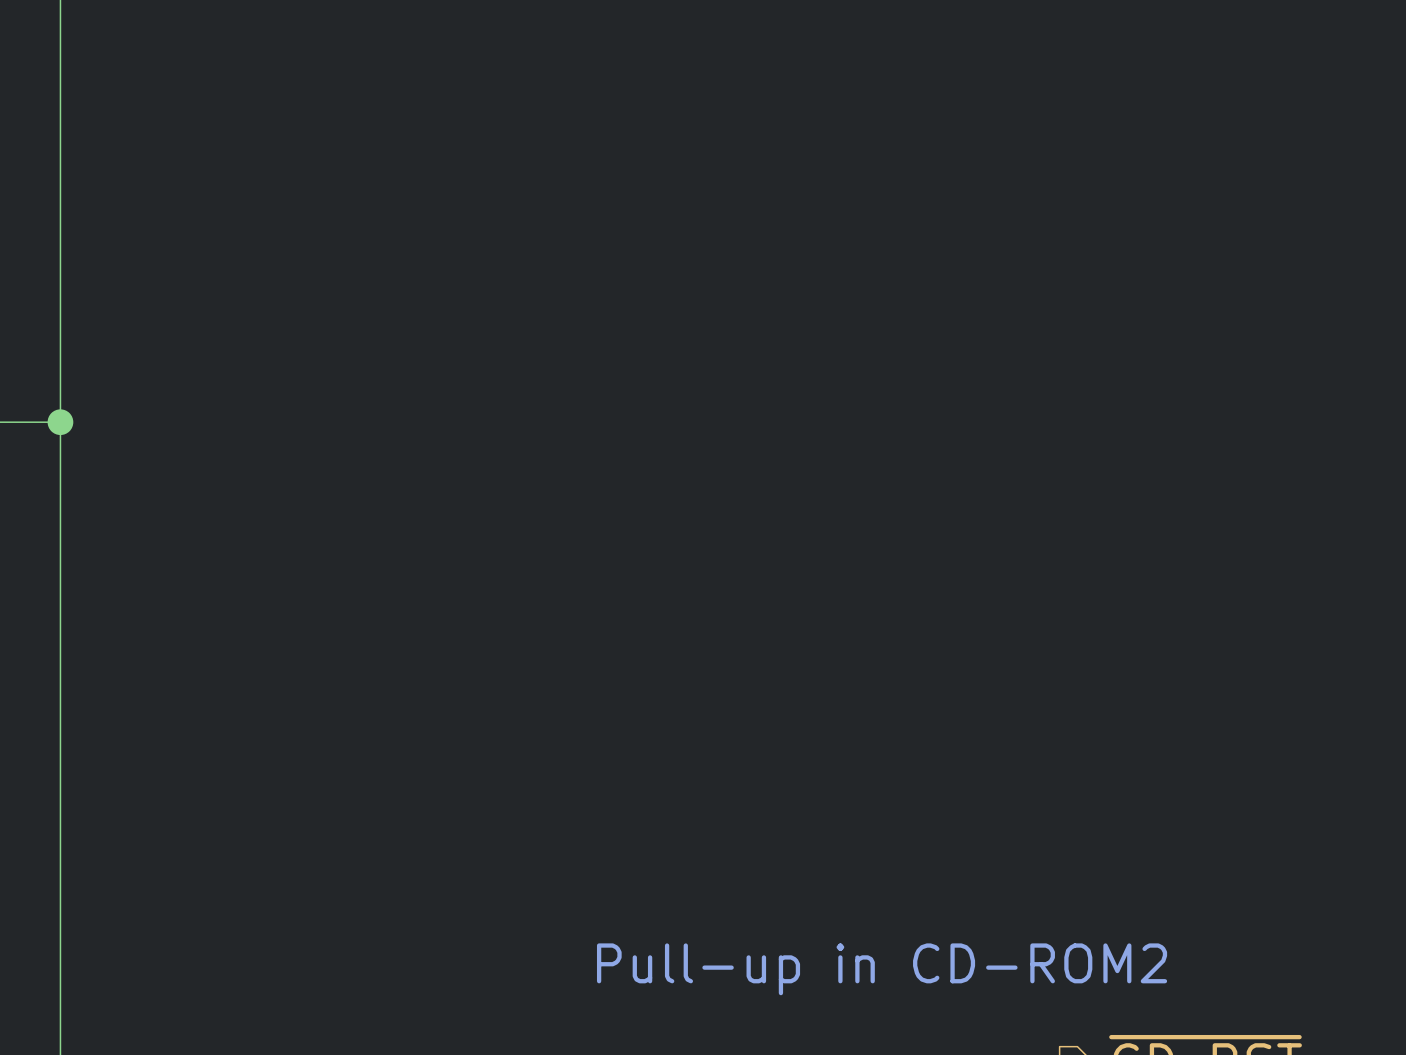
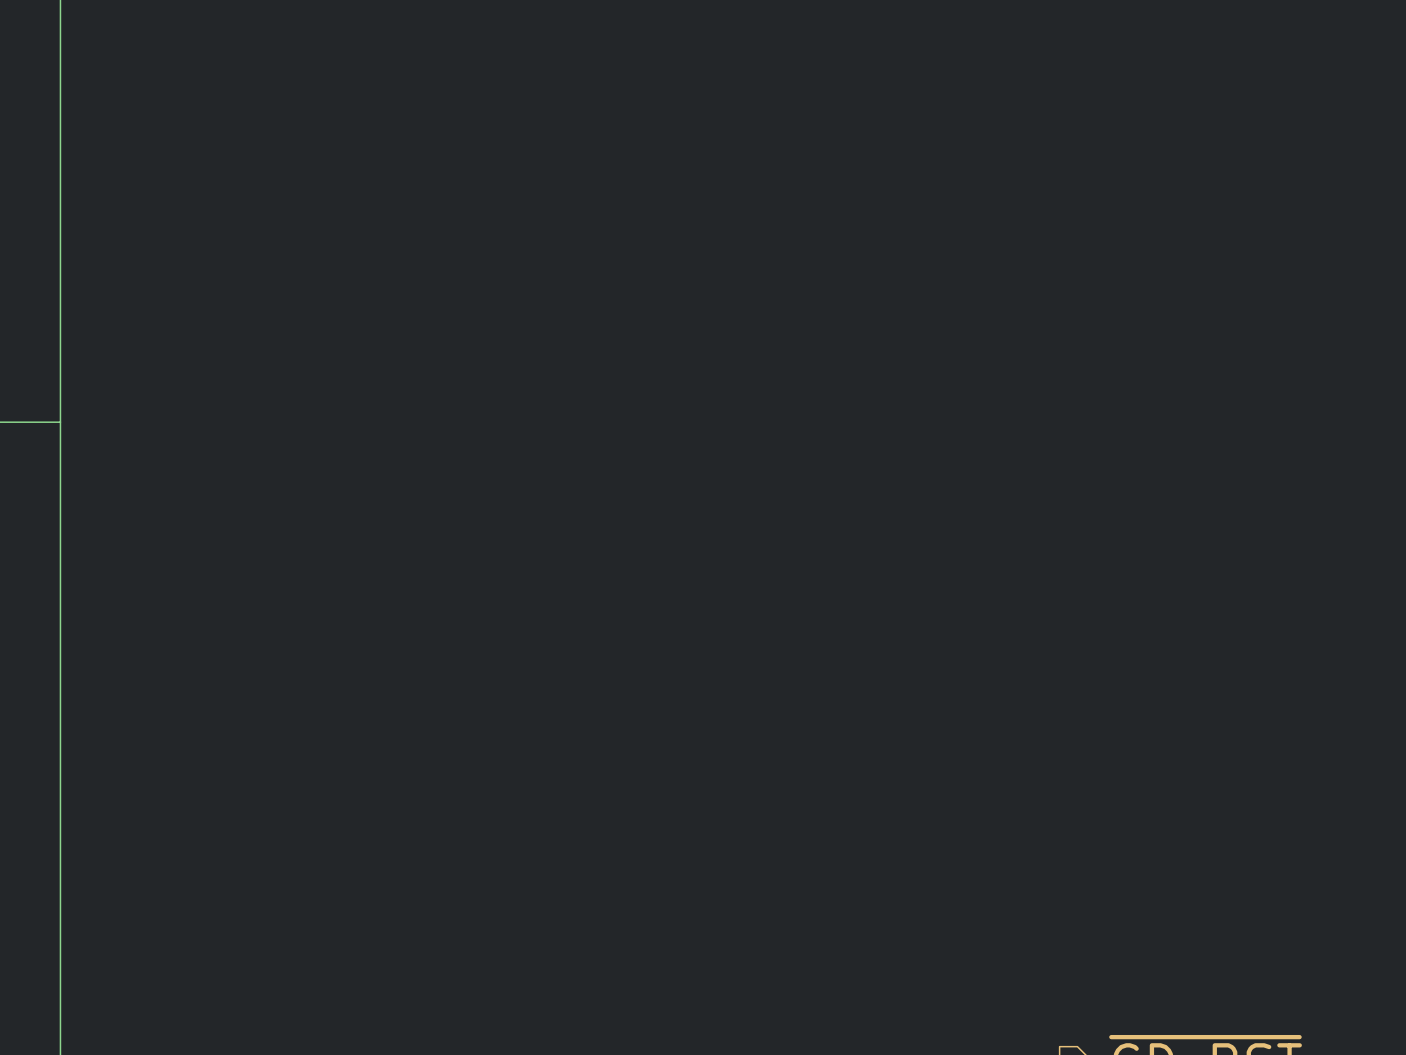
junction: (60, 422) -> none
text: Pull-up in CD-ROM2 (882, 969) -> none

